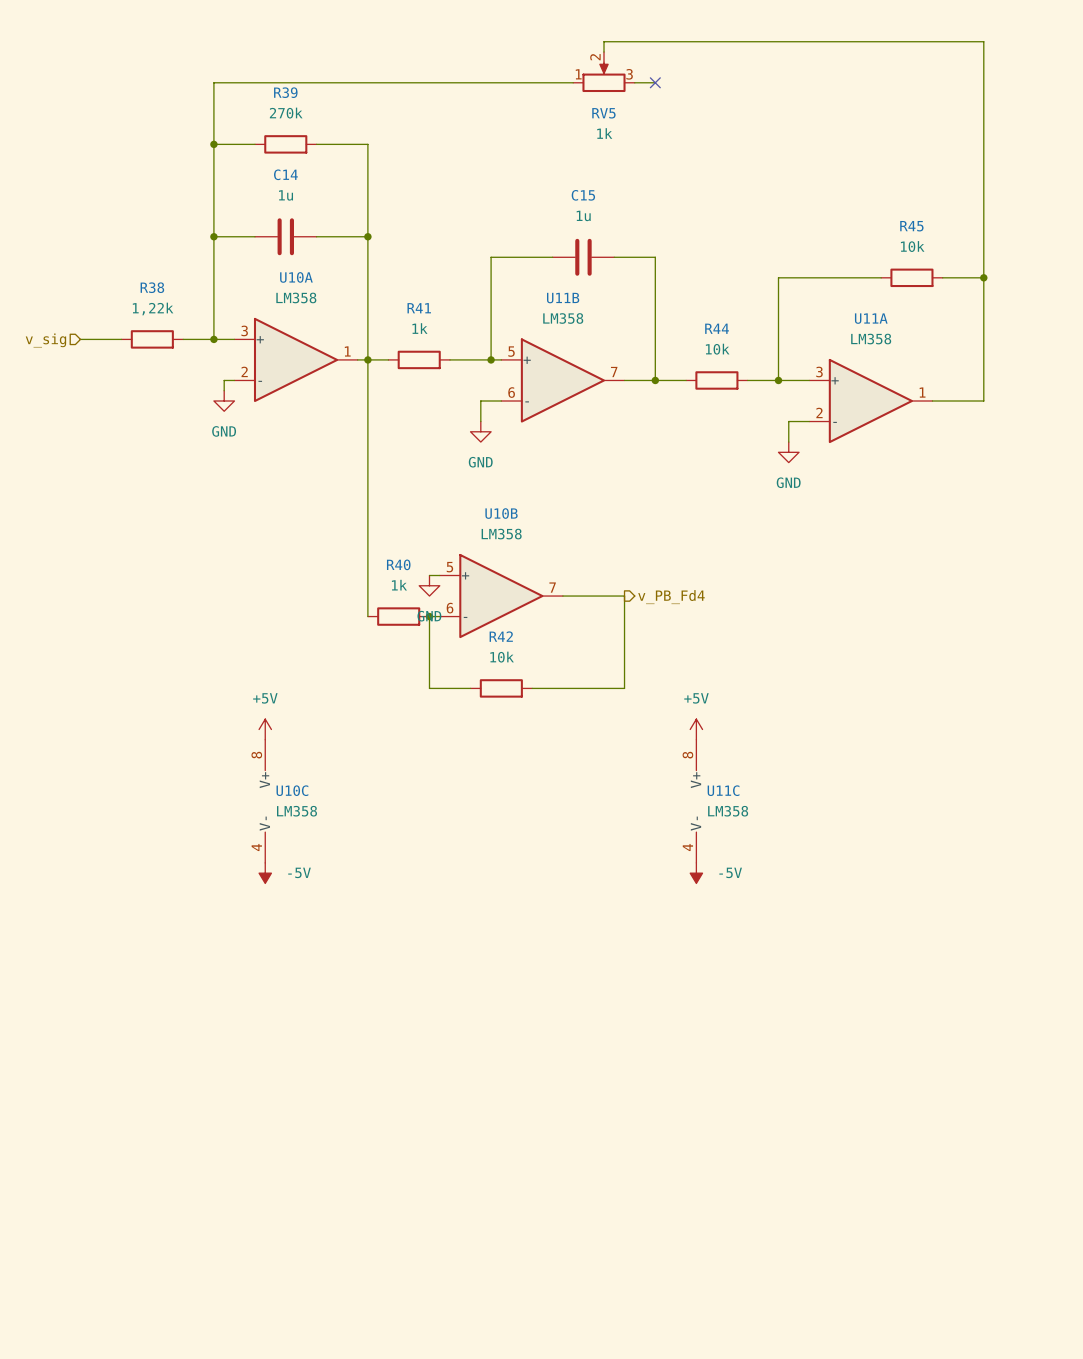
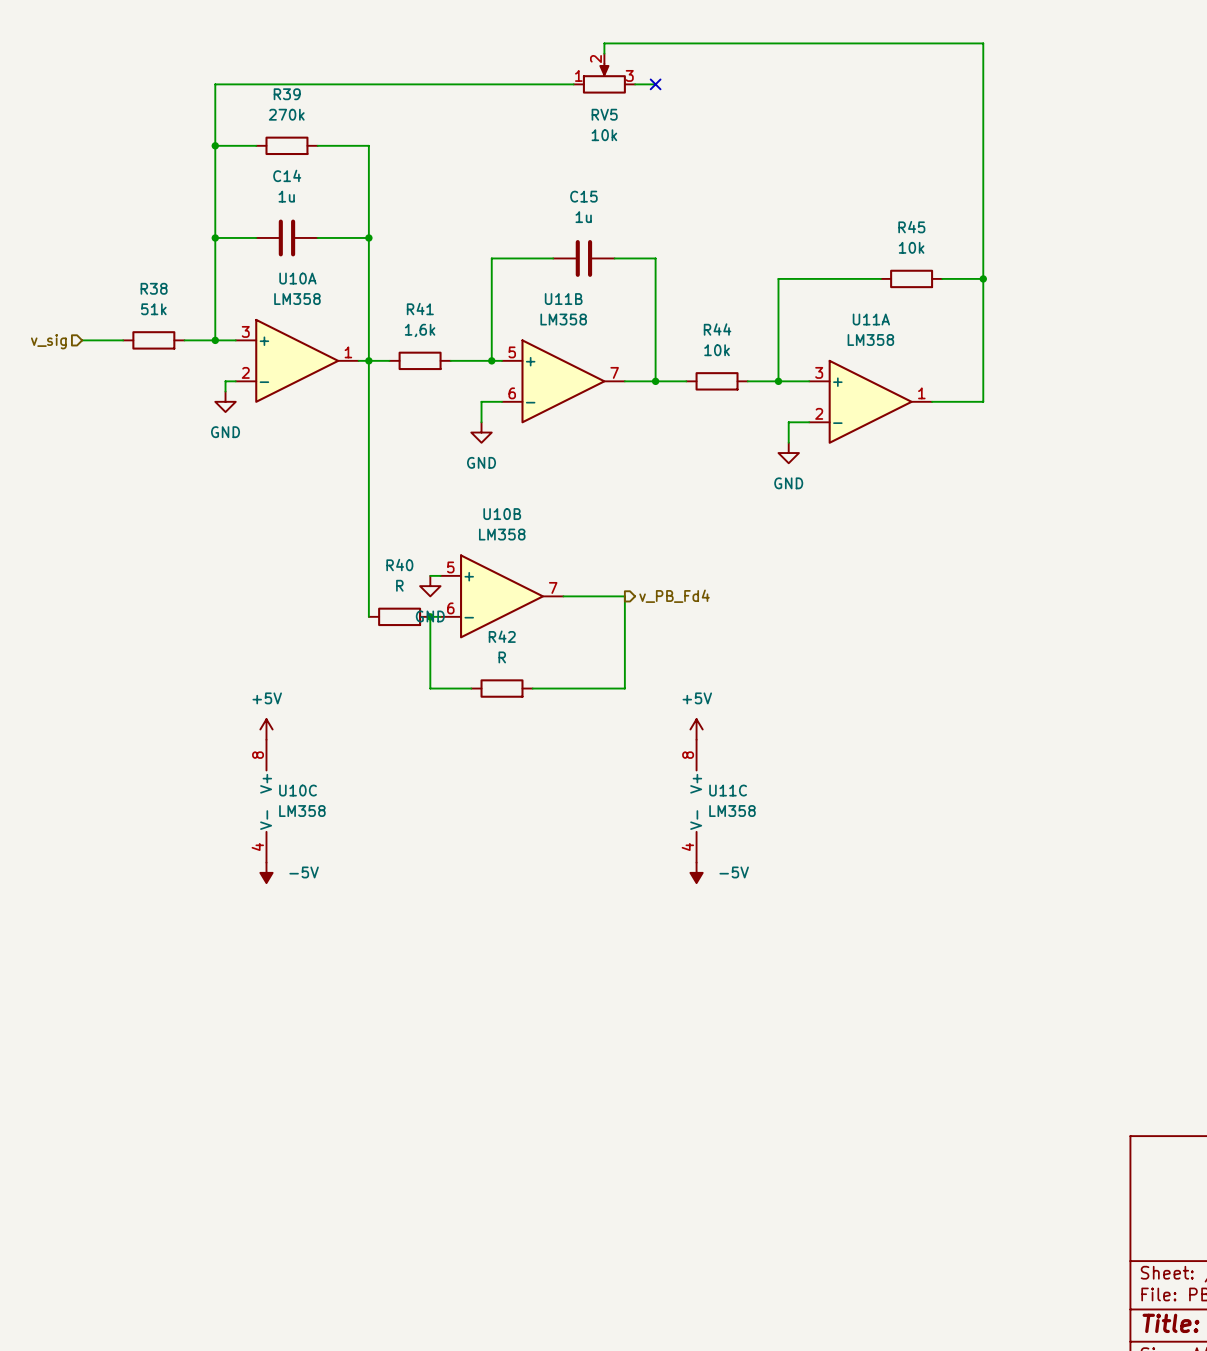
RV5 value: 1k (604, 133) -> 10k (604, 135)
R38 value: 1,22k (153, 309) -> 51k (153, 309)
R41 value: 1k (419, 328) -> 1,6k (420, 330)
R40 value: 1k (399, 585) -> R (399, 585)
R42 value: 10k (502, 657) -> R (502, 657)

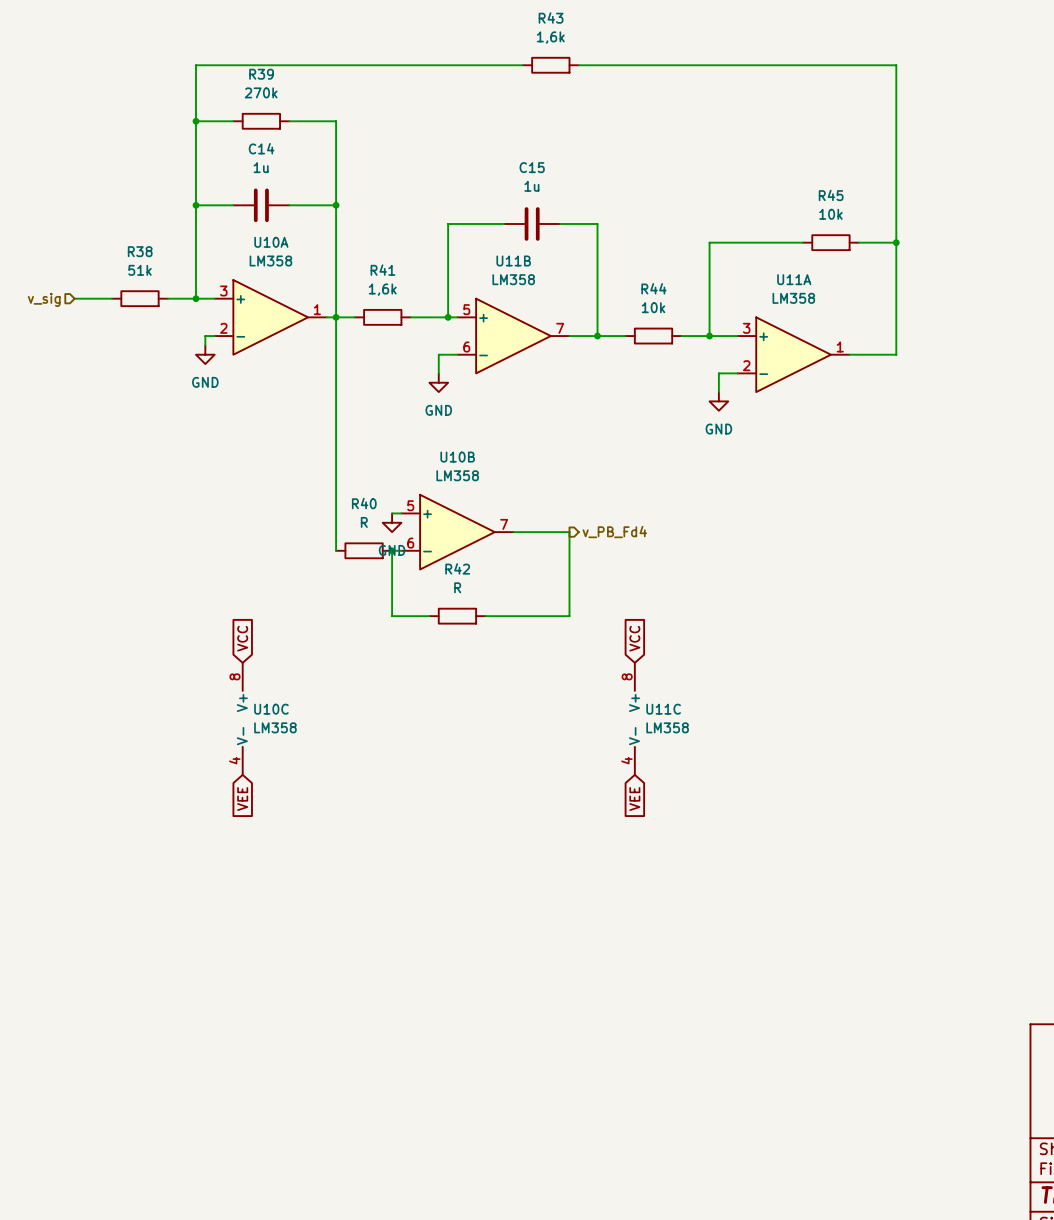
wire: (604, 53) (604, 43) (983, 43) (983, 84) -> (597, 65) (896, 65)
RV5: 10k (604, 73) -> none
R43: none -> 1,6k (550, 65)
no-connect mark: (655, 84) -> none
global label: none -> VCC (242, 638)
global label: none -> VCC (634, 638)
power symbol: +5V (266, 729) -> none
power symbol: +5V (696, 729) -> none
power symbol: -5V (266, 872) -> none
power symbol: -5V (696, 872) -> none
global label: none -> VEE (242, 799)
global label: none -> VEE (634, 799)

